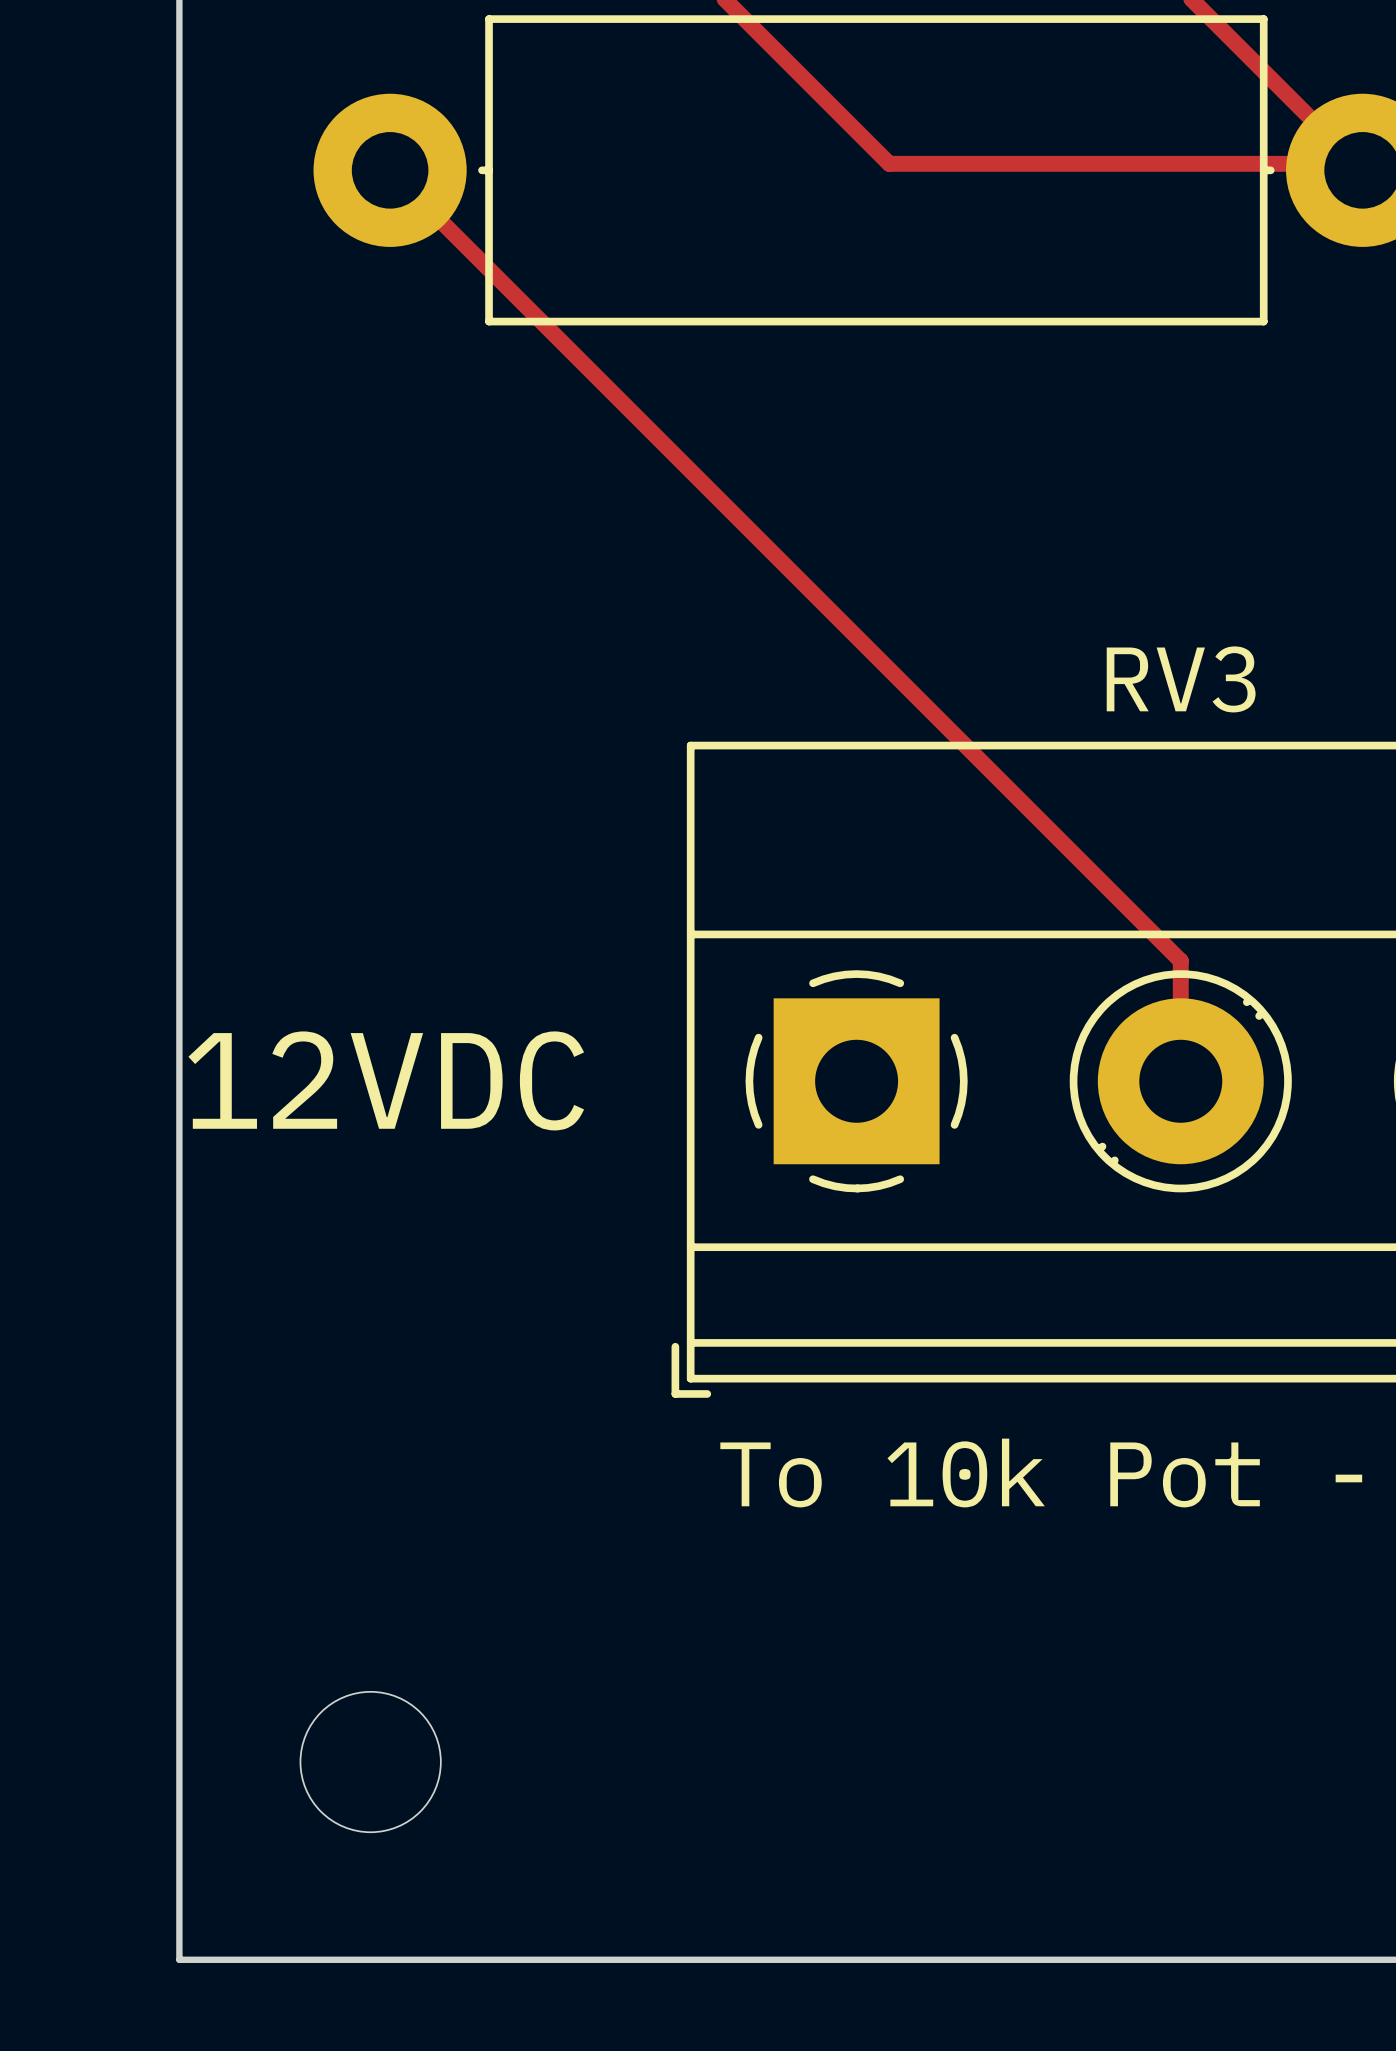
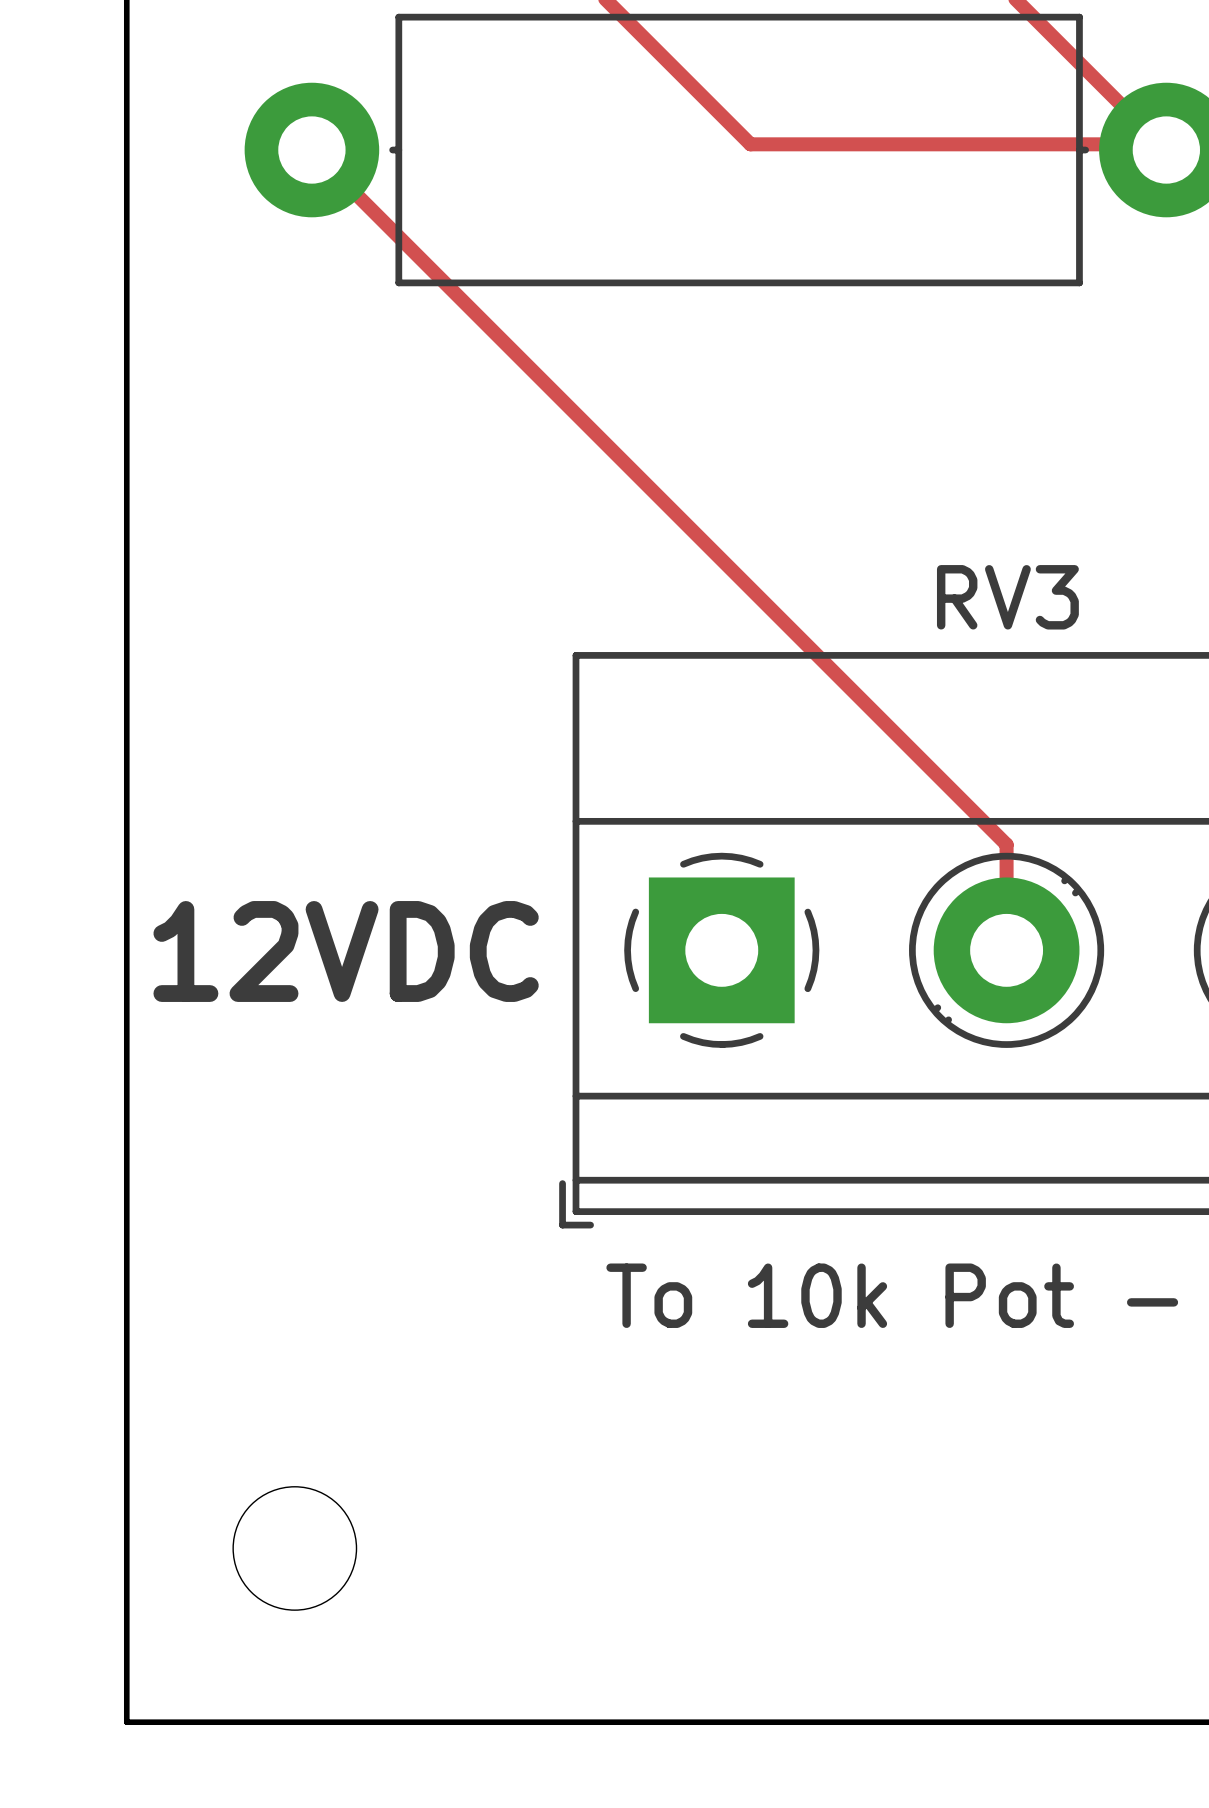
text position: 12VDC (386, 1080) -> 12VDC (346, 951)

